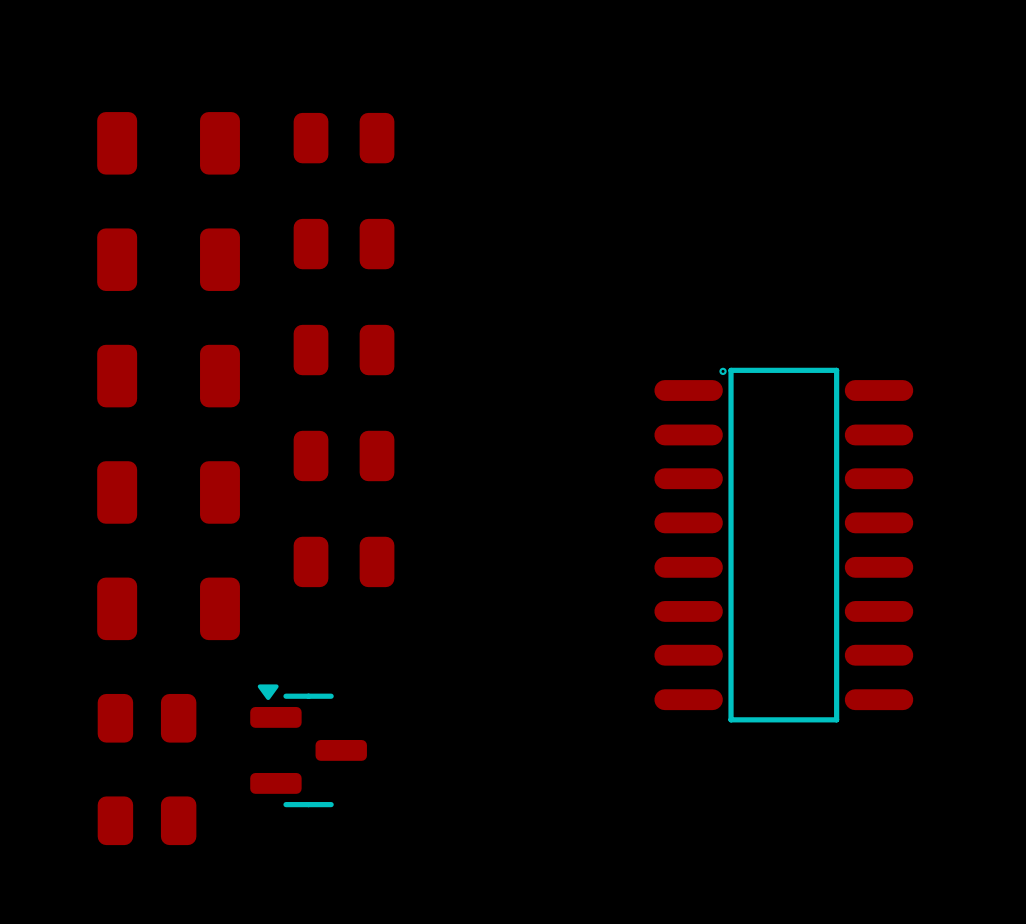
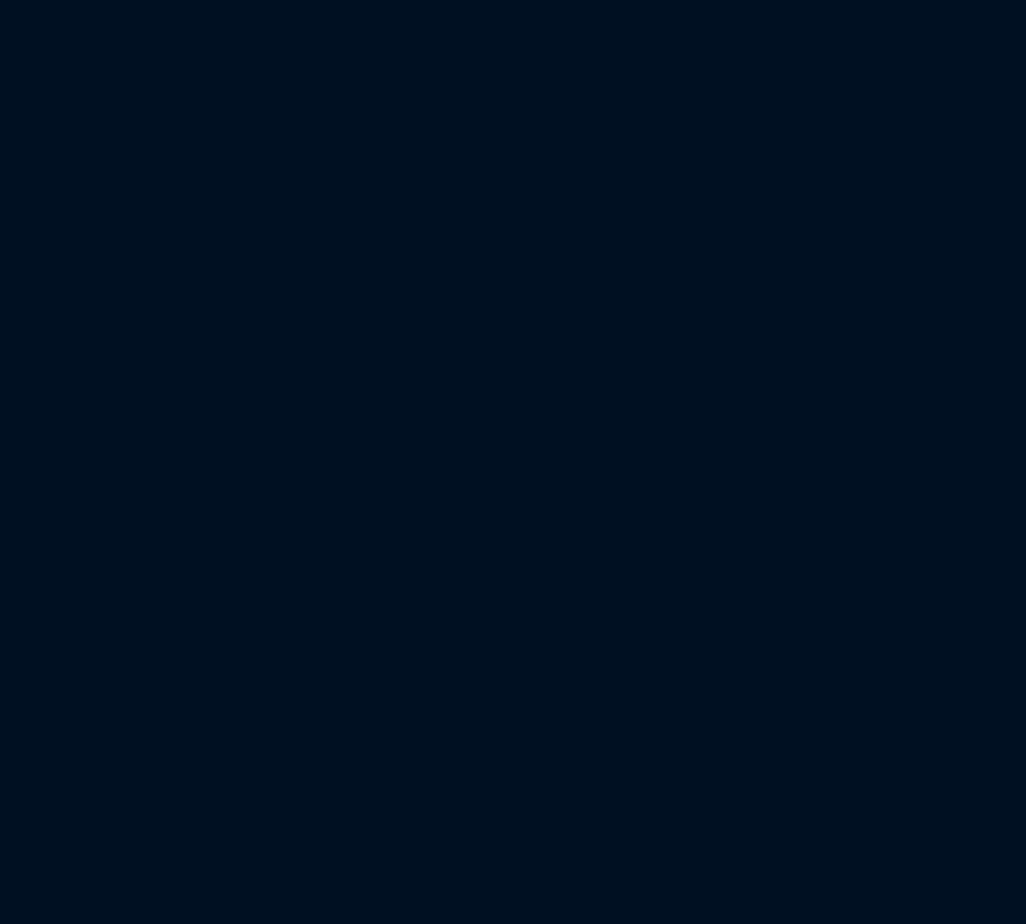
part: (344, 138) -> none
part: (168, 143) -> none
part: (344, 244) -> none
part: (168, 259) -> none
part: (344, 350) -> none
part: (168, 376) -> none
part: (344, 455) -> none
part: (168, 492) -> none
part: (783, 545) -> none
part: (344, 561) -> none
part: (168, 608) -> none
part: (147, 718) -> none
part: (308, 745) -> none
part: (147, 820) -> none

